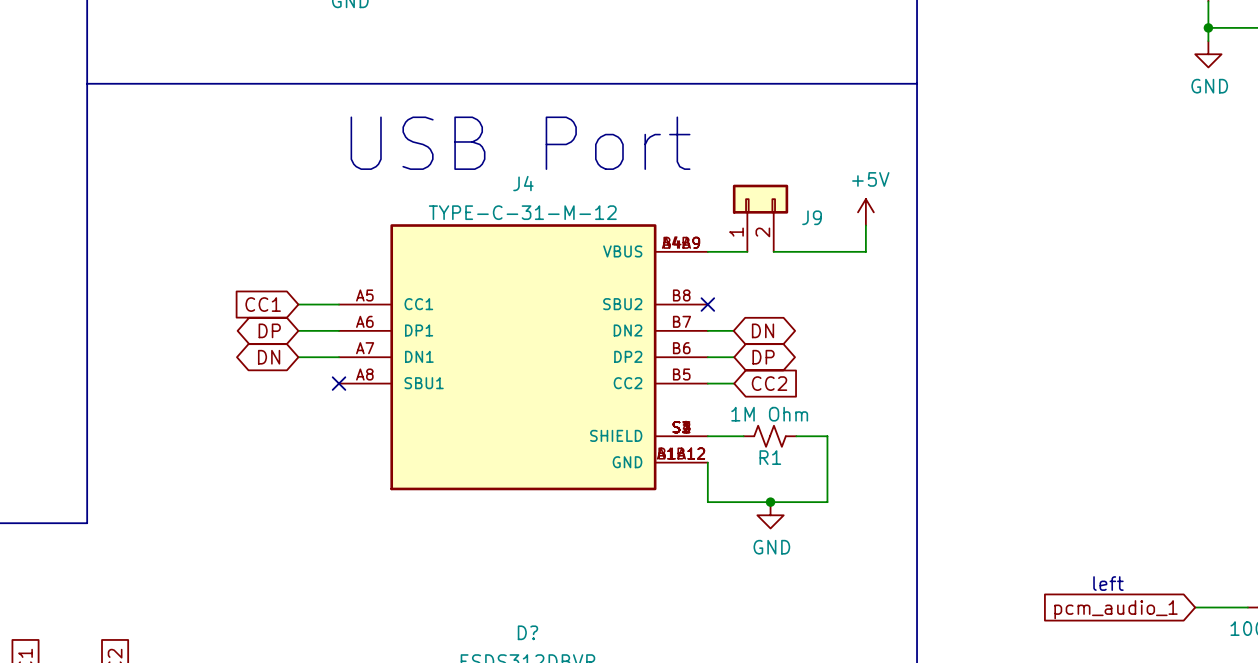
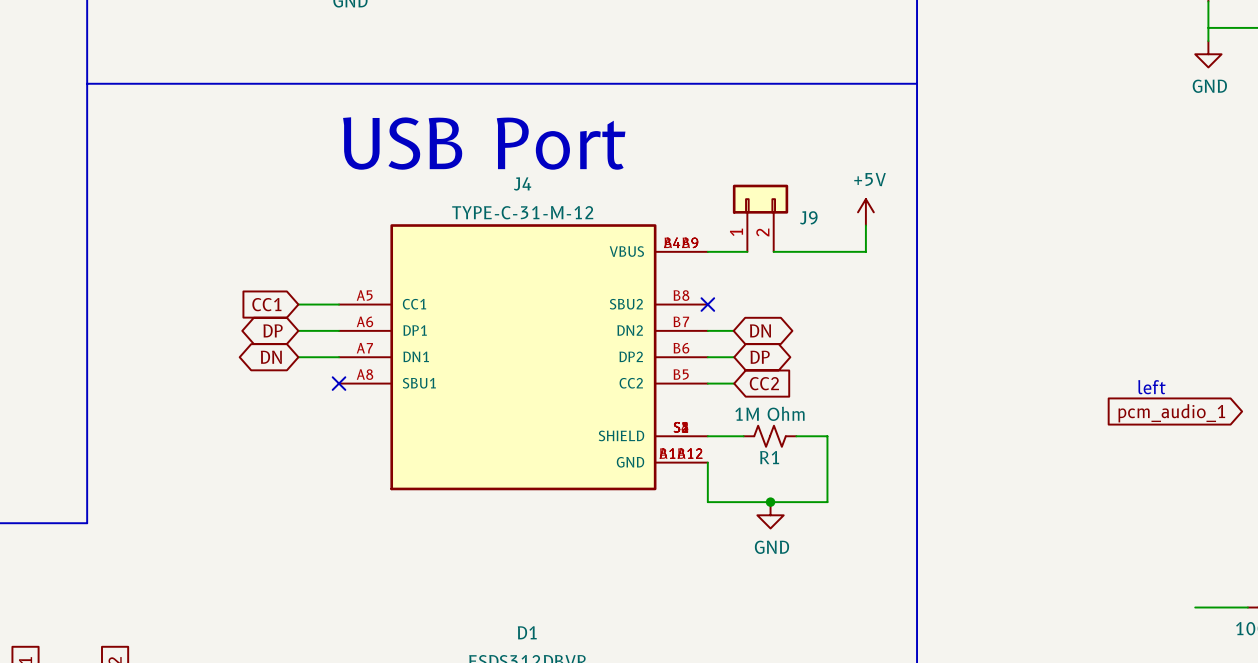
junction: (1208, 27) -> none
text position: left (1108, 583) -> left (1151, 387)
global label position: pcm_audio_1 (1116, 609) -> pcm_audio_1 (1171, 413)
D? name: D? (527, 632) -> D1 (527, 632)

